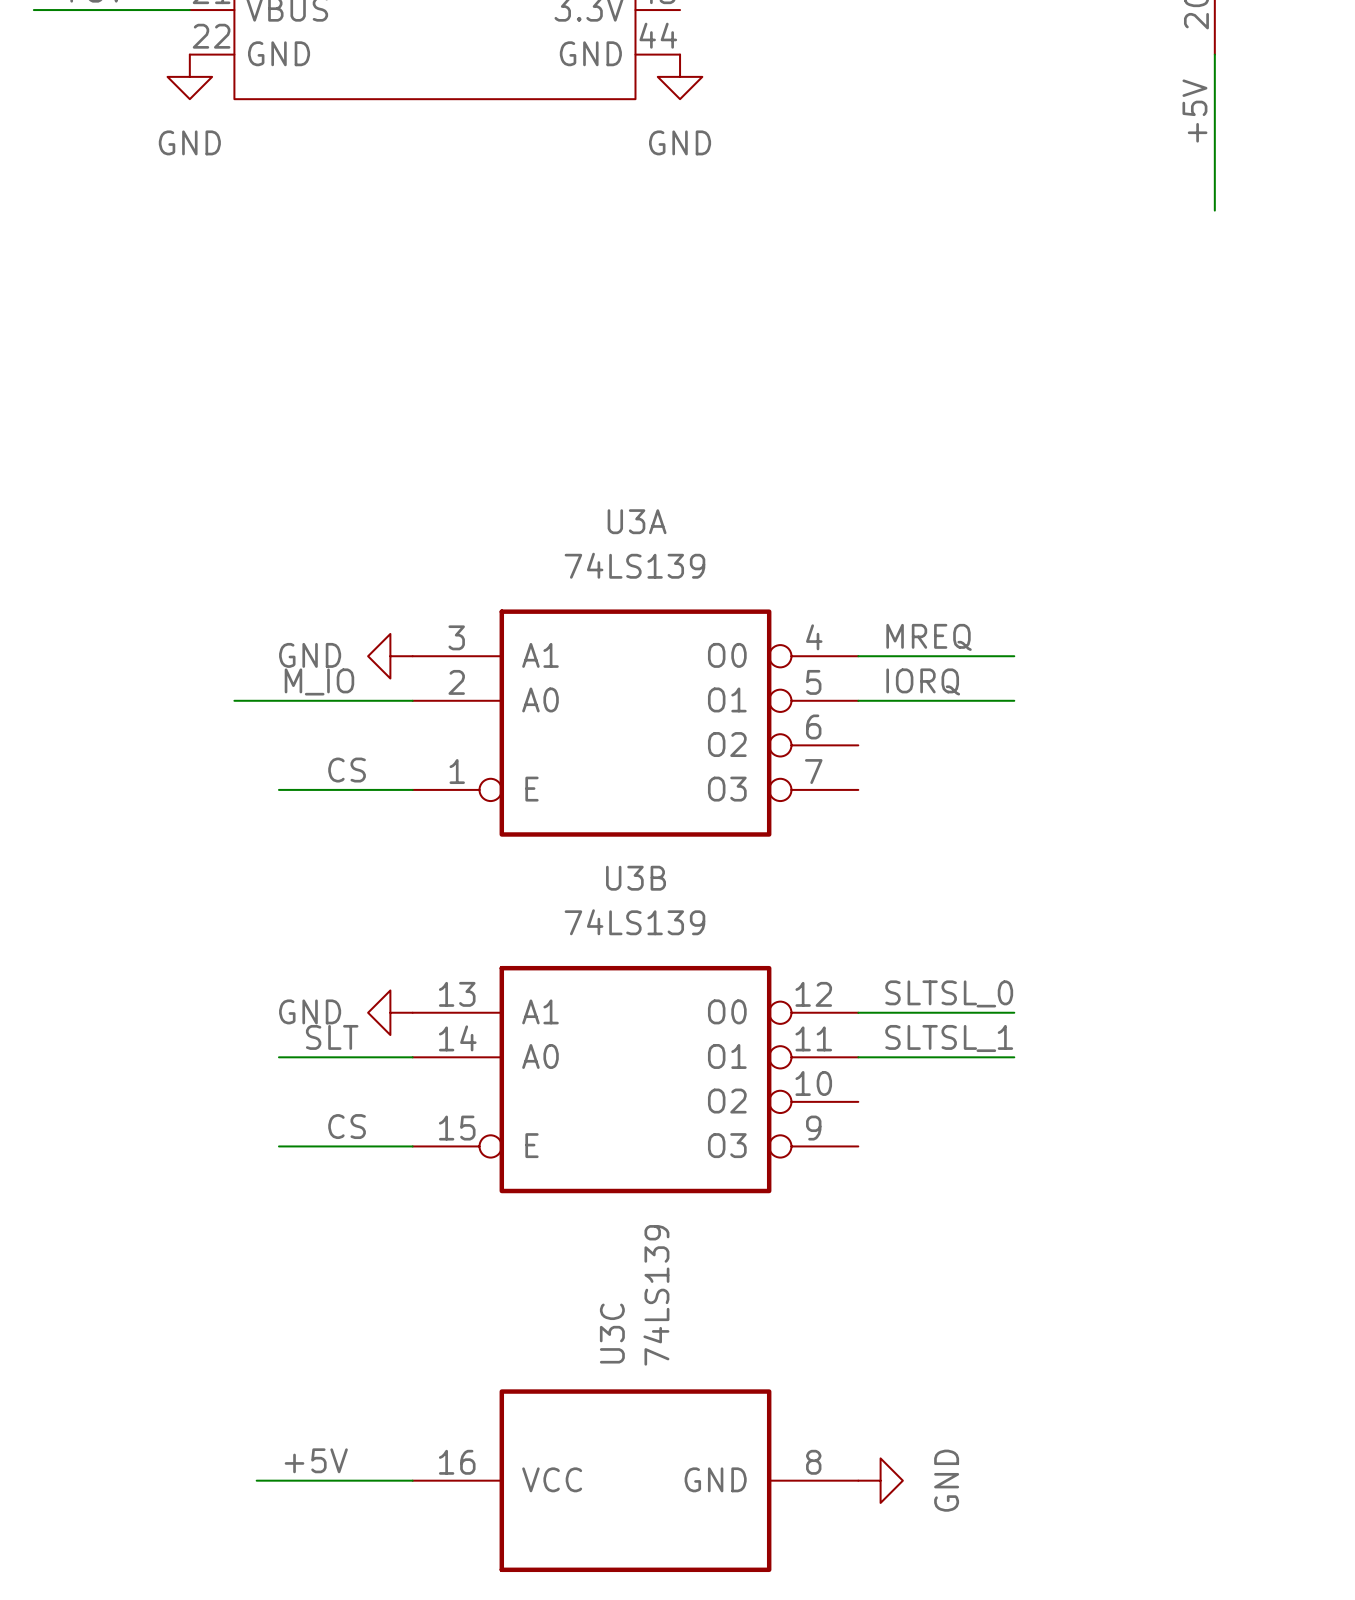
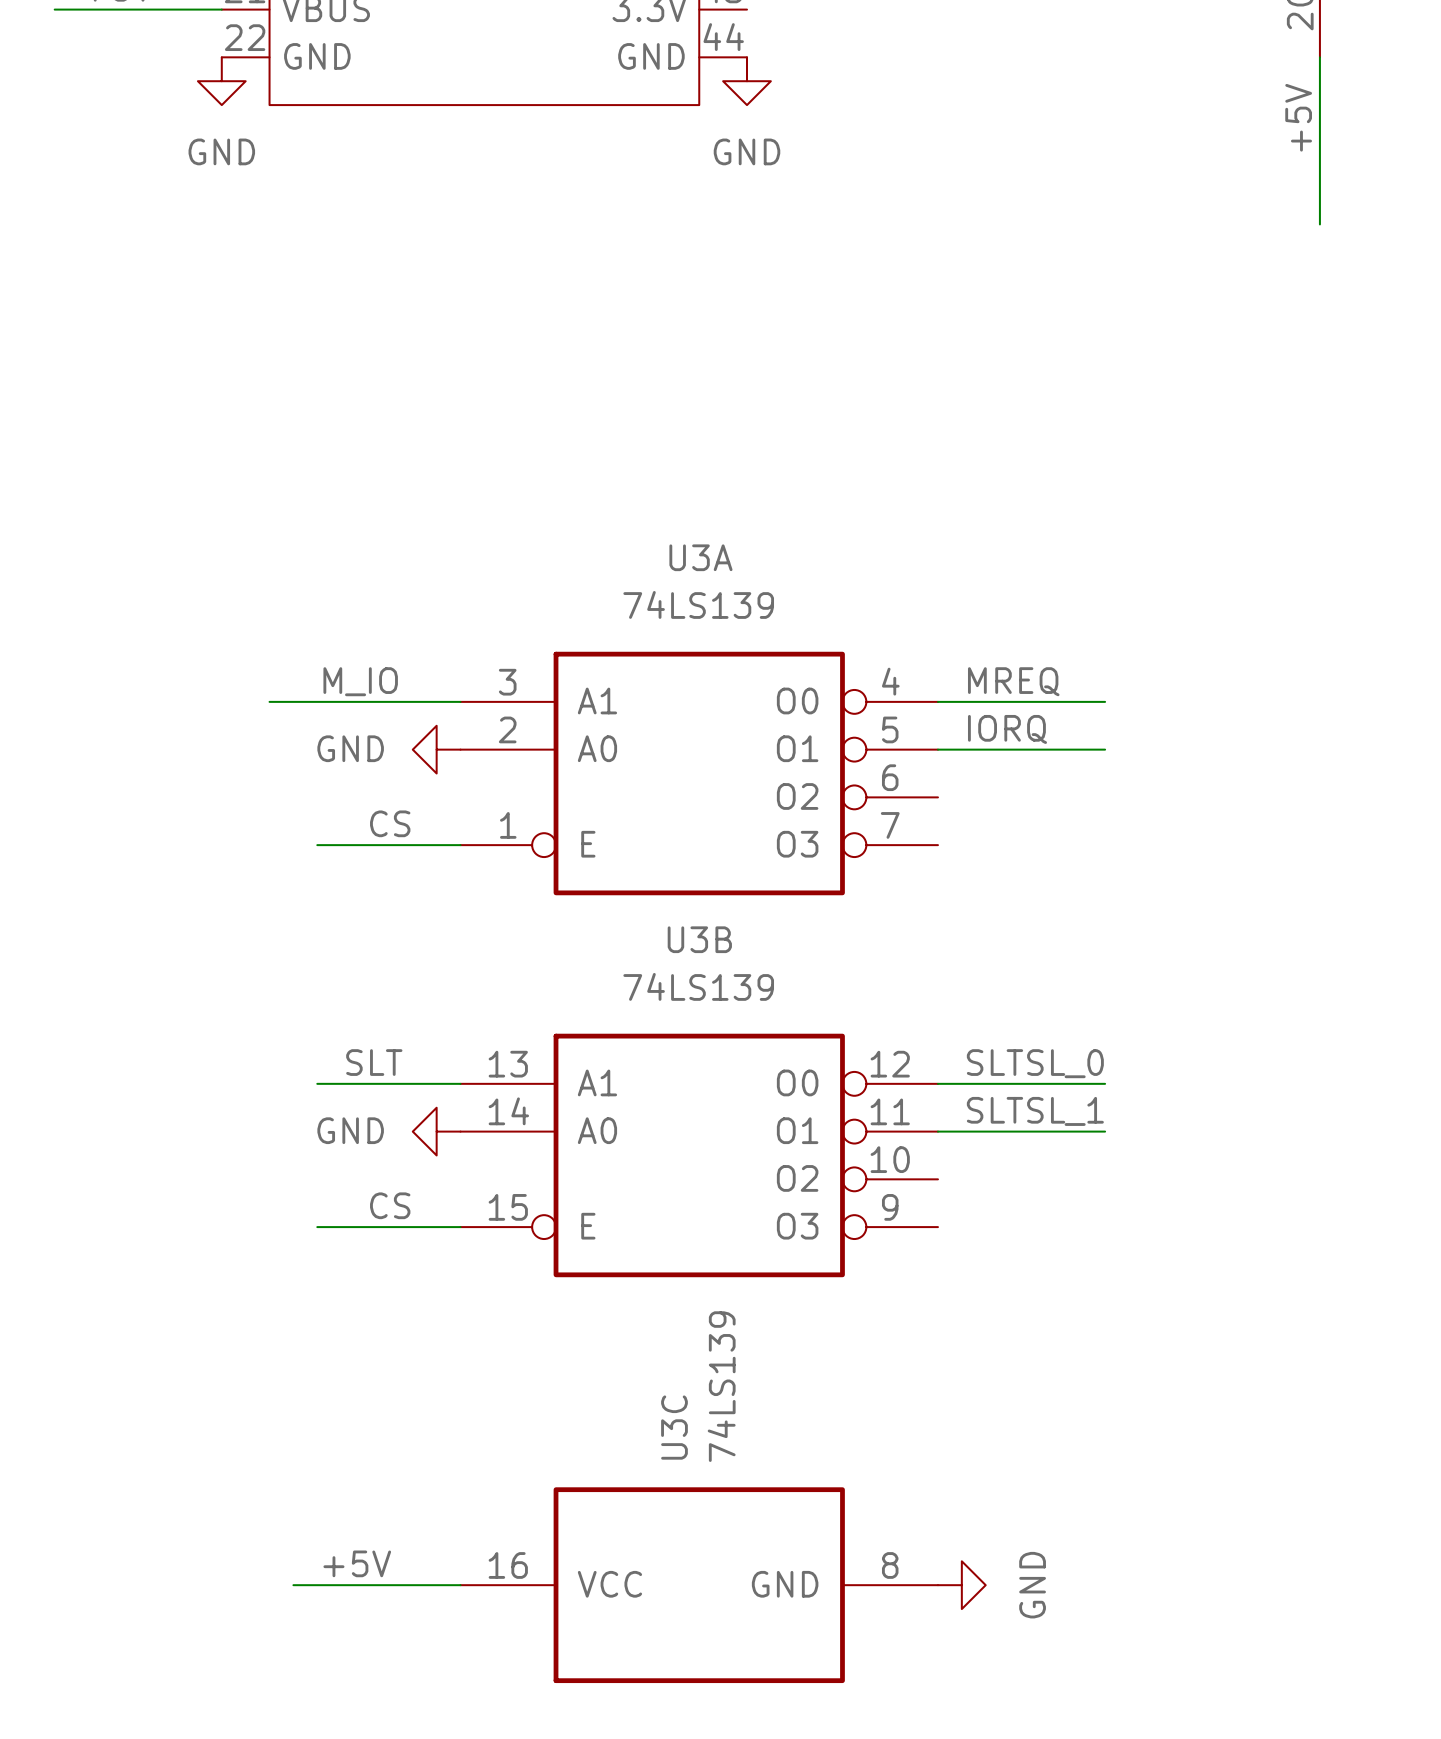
power symbol position: GND (390, 656) -> GND (436, 749)
label position: M_IO (319, 681) -> M_IO (360, 681)
wire: (234, 700) (412, 700) -> (269, 701) (460, 701)
power symbol position: GND (390, 1012) -> GND (436, 1131)
label position: SLT (332, 1037) -> SLT (374, 1062)
wire: (278, 1057) (412, 1057) -> (317, 1083) (460, 1083)

